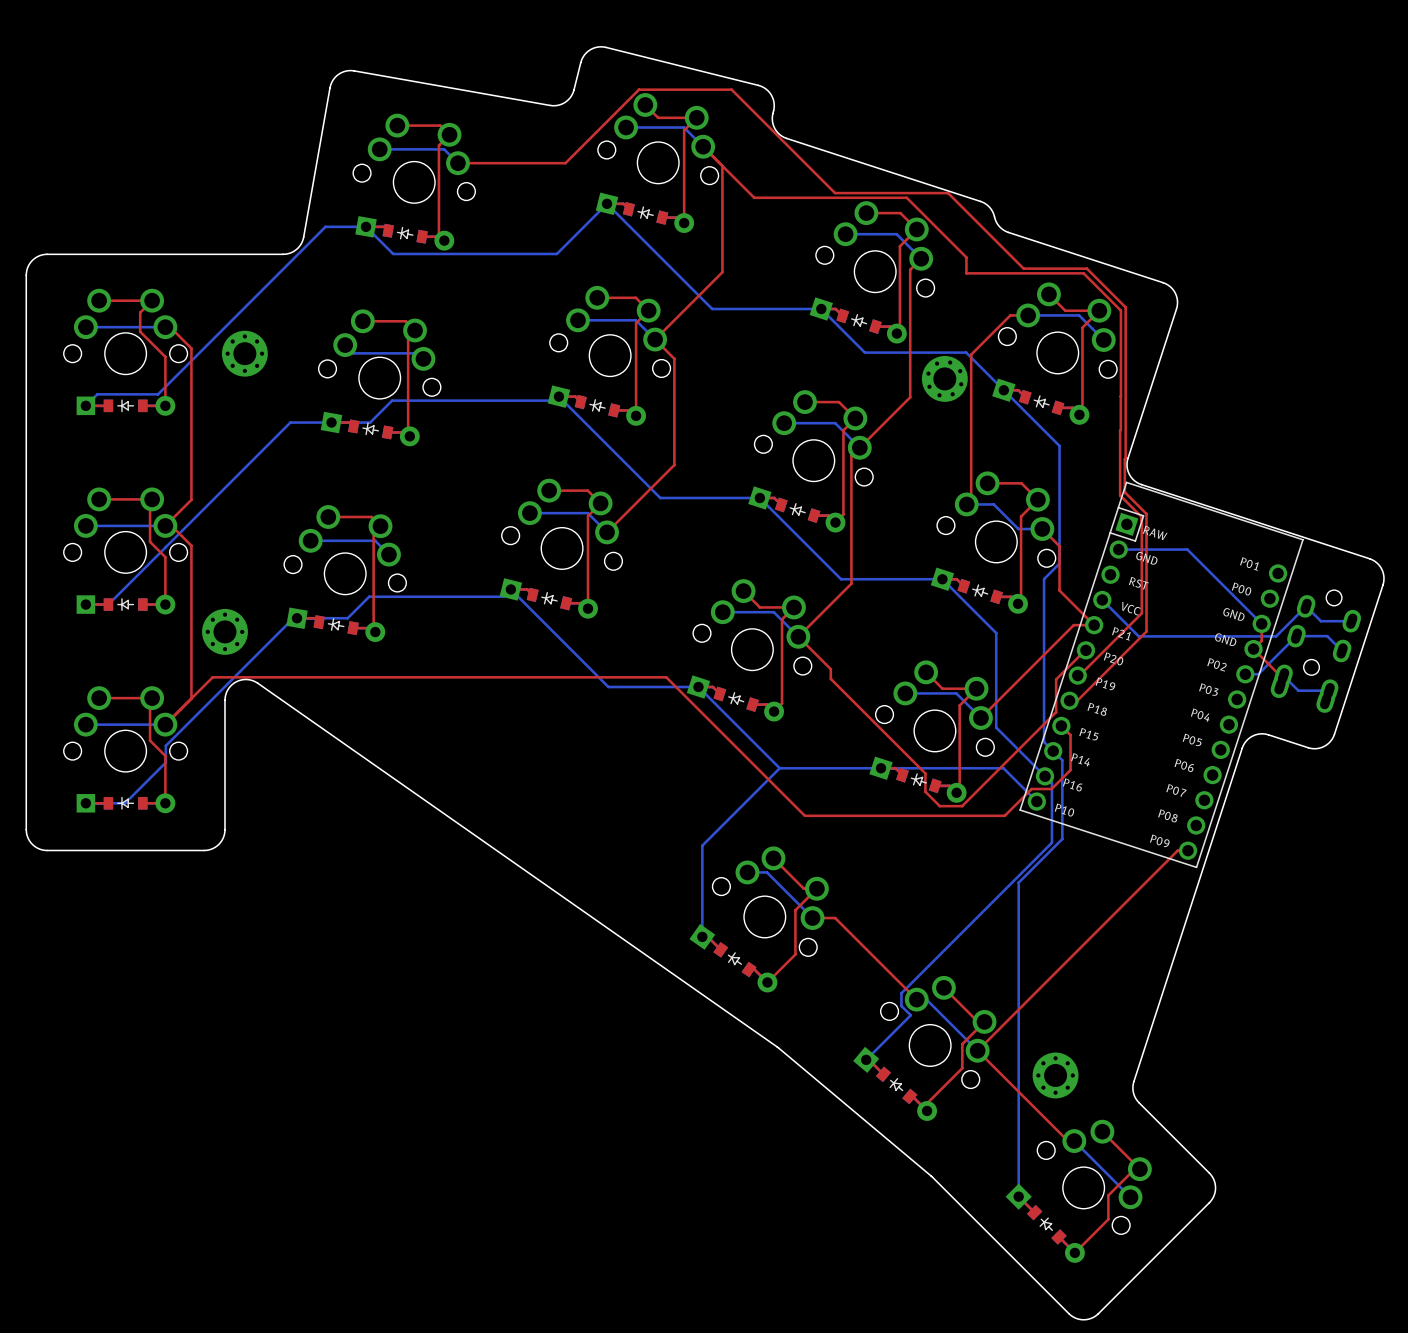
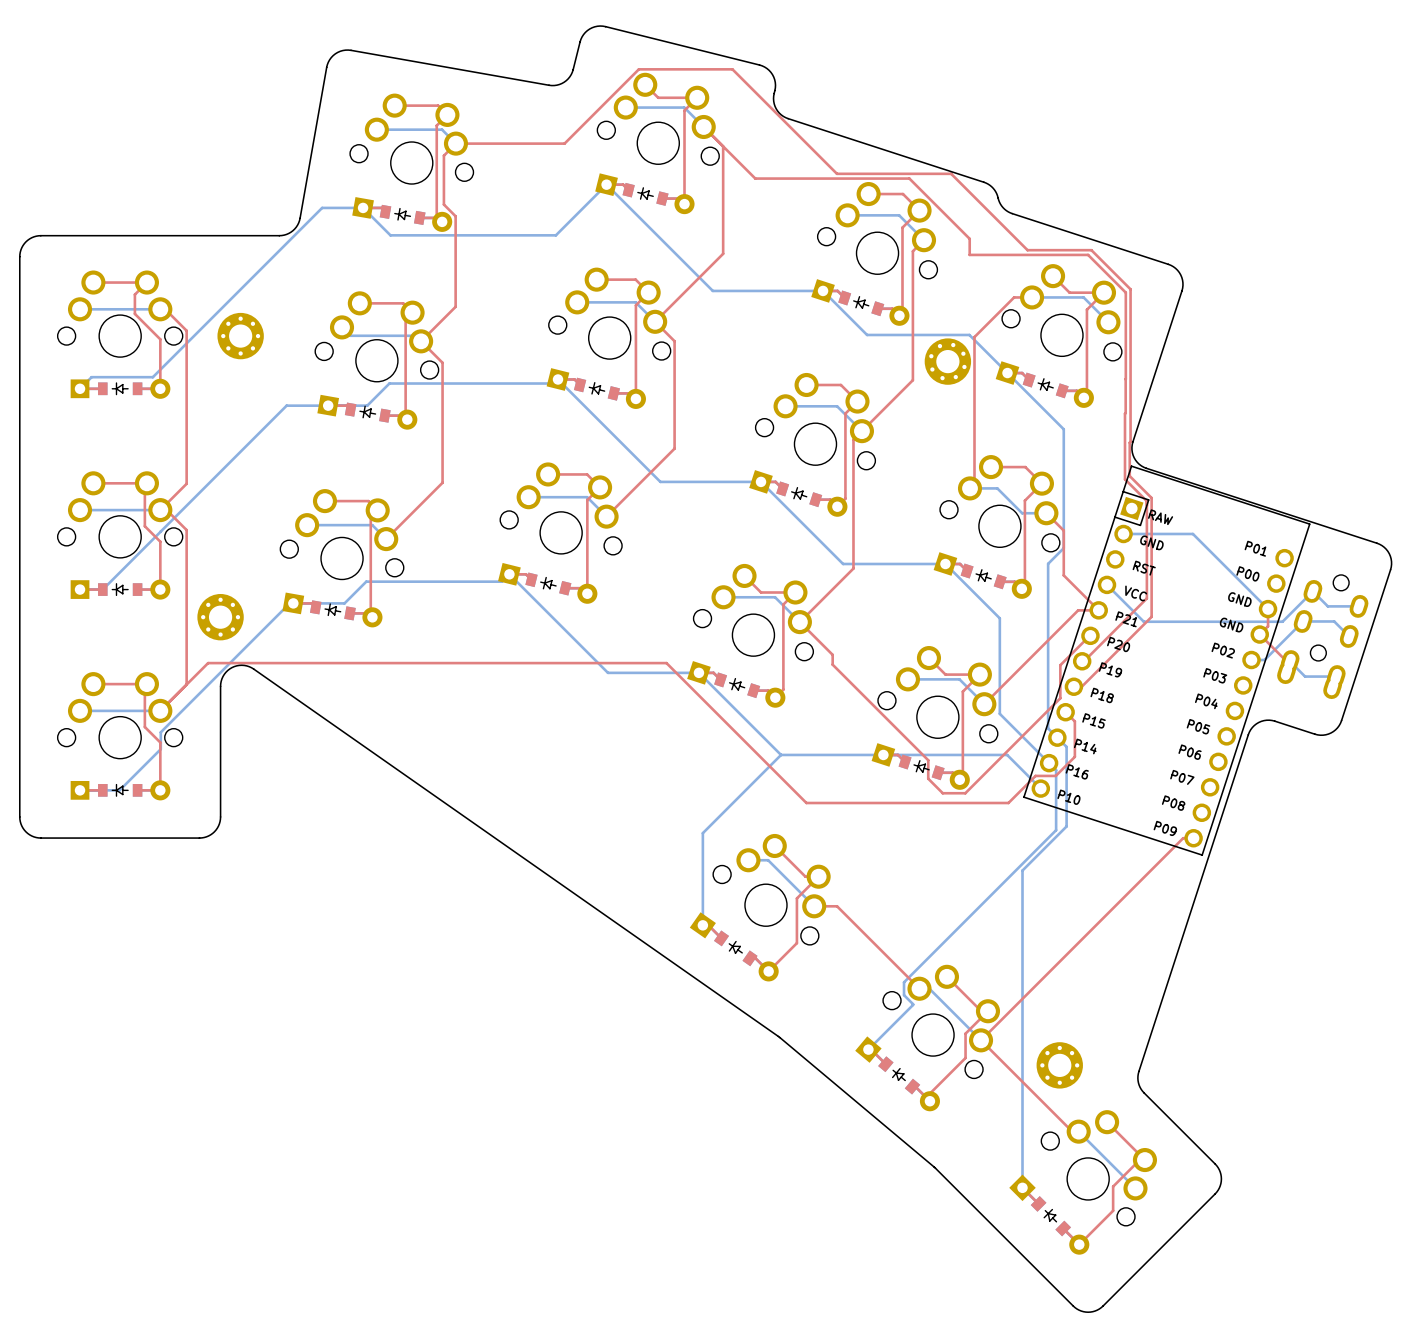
top track: none -> (455, 143) (443, 155) (443, 204) (455, 216) (455, 306) (421, 341) (442, 362) (442, 482) (386, 539)

